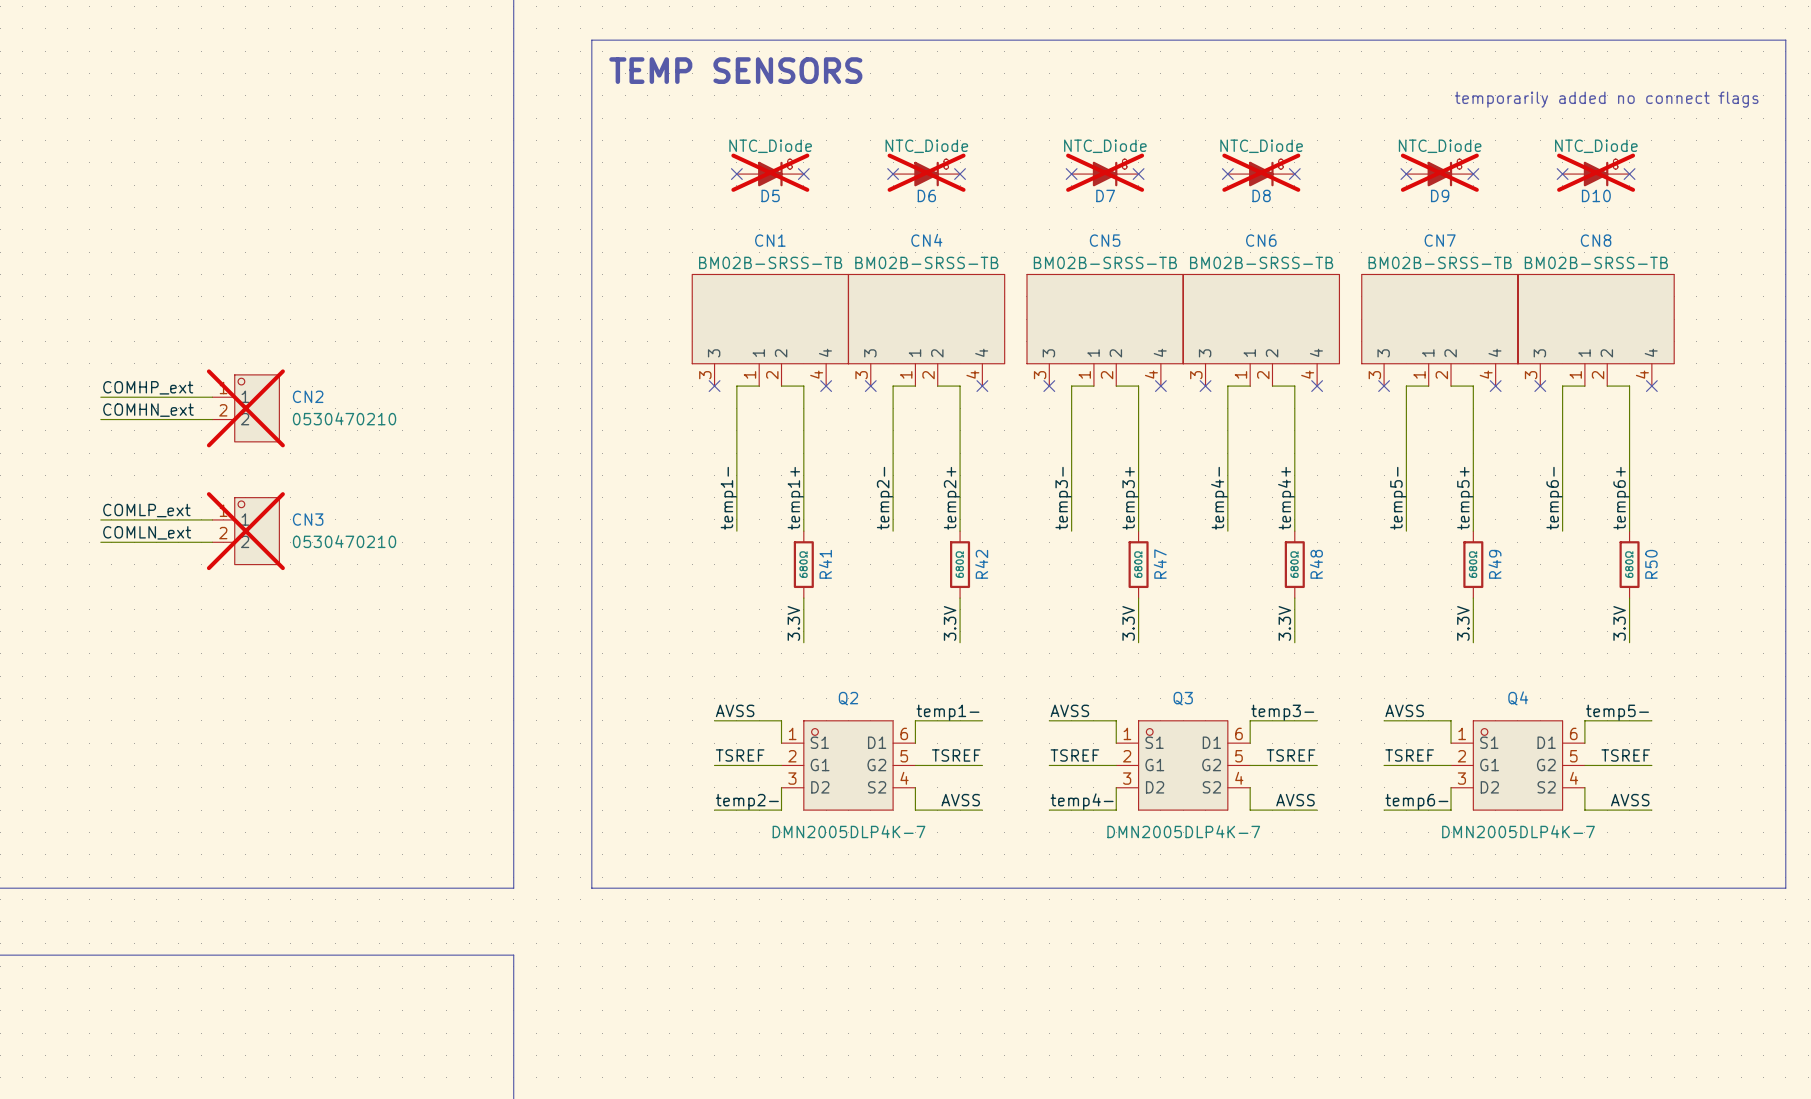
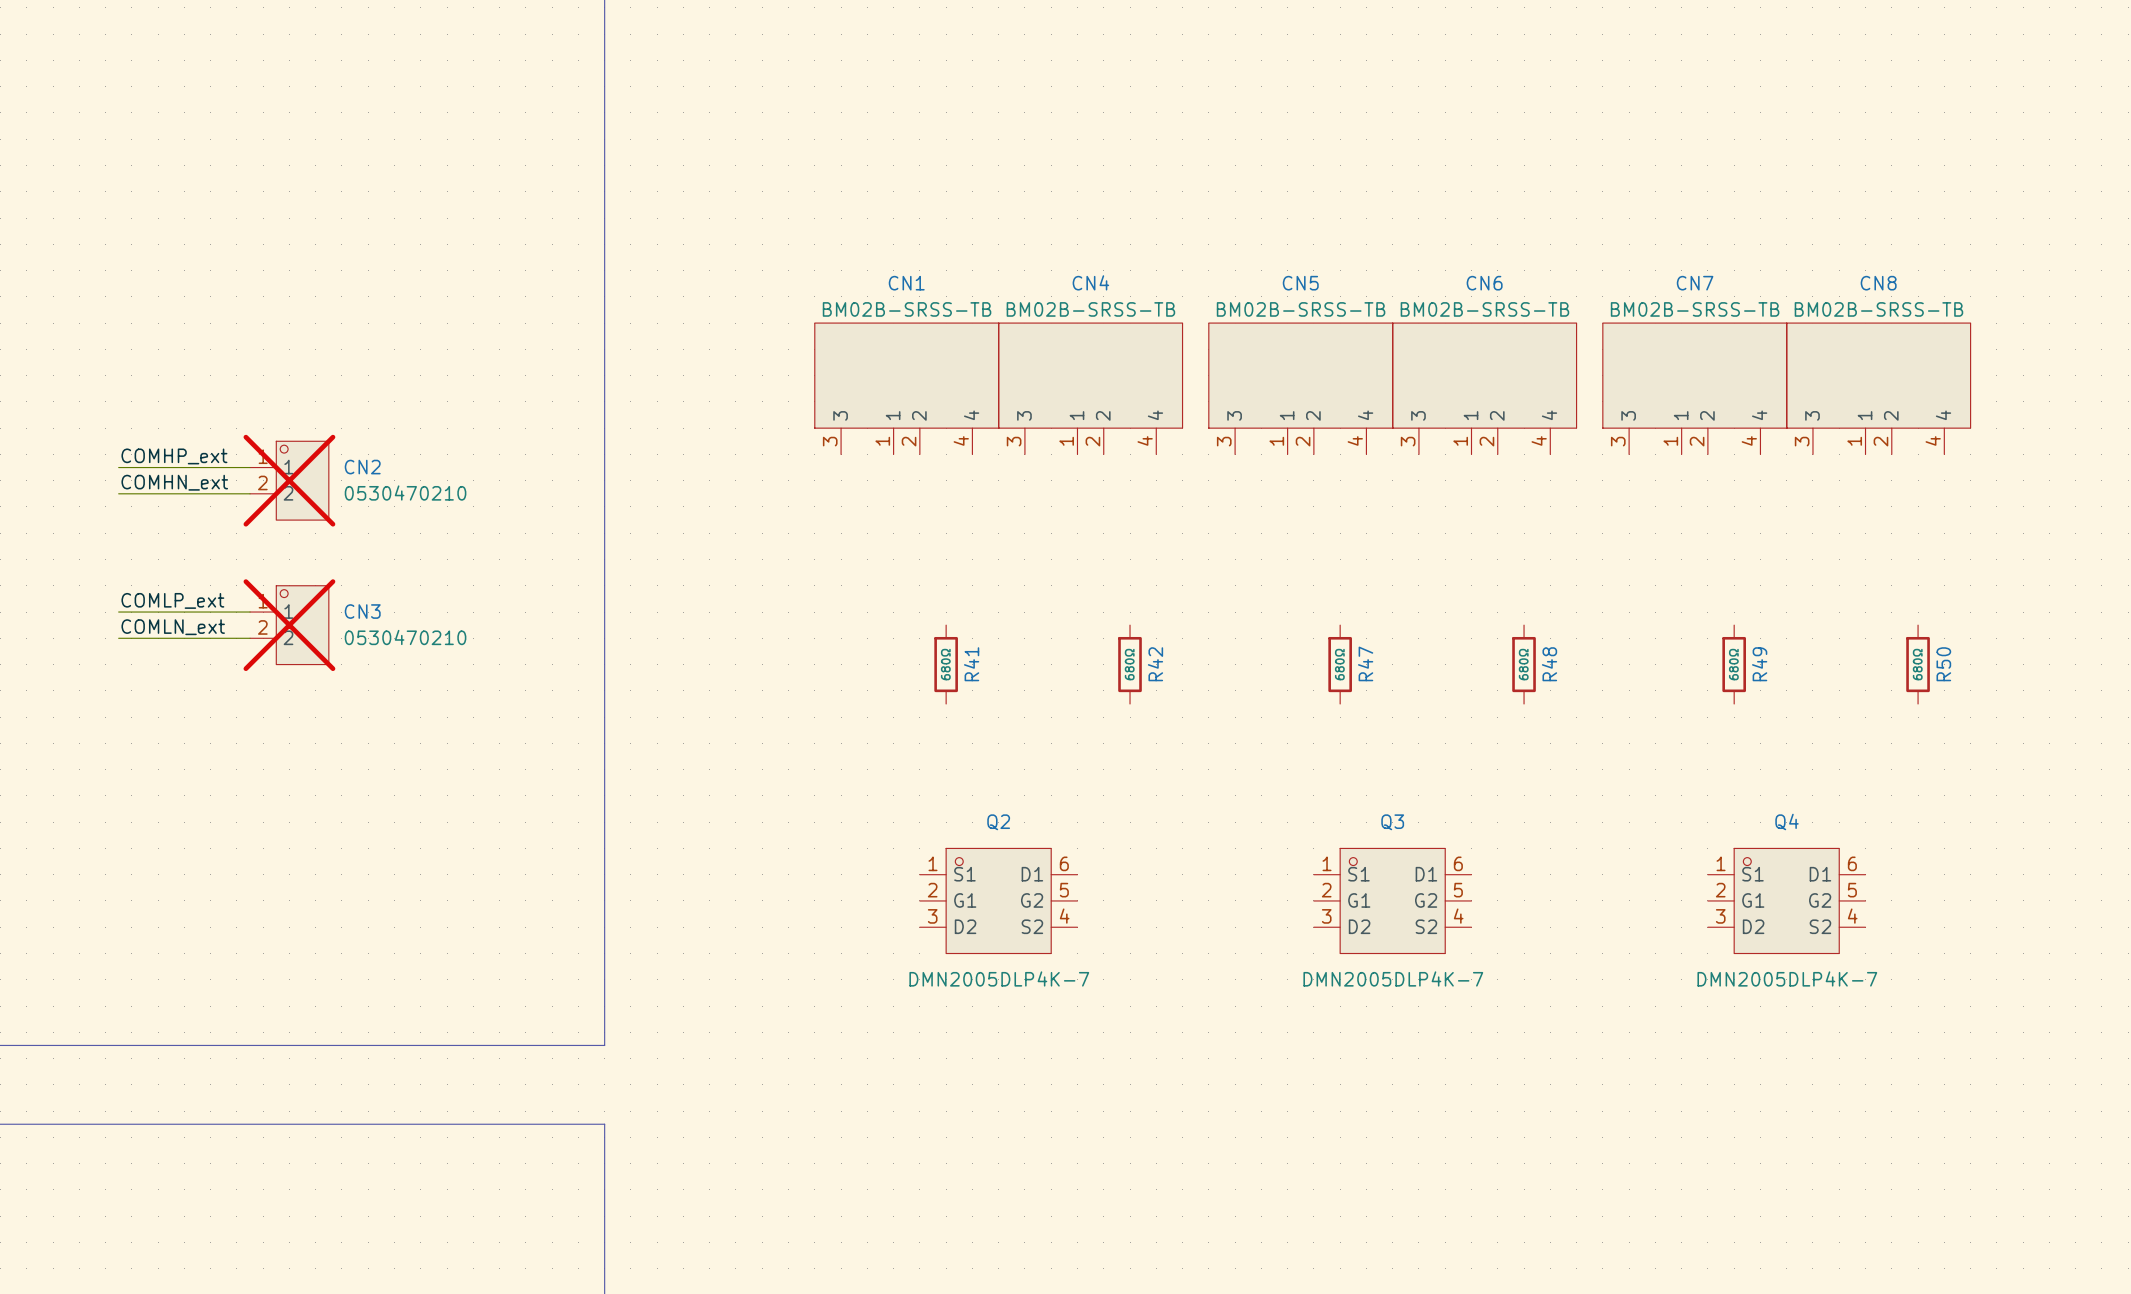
line: (591, 40) (1785, 40) (1785, 888) (591, 888) (591, 40) -> none
text: TEMP SENSORS (735, 70) -> none
text: temporarily added no connect flags (1606, 99) -> none
D5: NTC_Diode (770, 172) -> none
D6: NTC_Diode (926, 172) -> none
D7: NTC_Diode (1105, 172) -> none
D8: NTC_Diode (1261, 172) -> none
D9: NTC_Diode (1439, 172) -> none
D10: NTC_Diode (1596, 172) -> none
no-connect mark: (736, 174) -> none
no-connect mark: (803, 174) -> none
no-connect mark: (893, 174) -> none
no-connect mark: (960, 174) -> none
no-connect mark: (1071, 174) -> none
no-connect mark: (1138, 174) -> none
no-connect mark: (1227, 174) -> none
no-connect mark: (1294, 174) -> none
no-connect mark: (1406, 174) -> none
no-connect mark: (1473, 174) -> none
no-connect mark: (1562, 174) -> none
no-connect mark: (1629, 174) -> none
no-connect mark: (714, 386) -> none
wire: (759, 386) (736, 386) (736, 531) -> none
wire: (781, 386) (803, 386) (803, 531) -> none
no-connect mark: (826, 386) -> none
no-connect mark: (870, 386) -> none
wire: (915, 386) (893, 386) (893, 531) -> none
wire: (937, 386) (960, 386) (960, 531) -> none
no-connect mark: (982, 386) -> none
no-connect mark: (1049, 386) -> none
wire: (1093, 386) (1071, 386) (1071, 531) -> none
wire: (1116, 386) (1138, 386) (1138, 531) -> none
no-connect mark: (1160, 386) -> none
no-connect mark: (1205, 386) -> none
wire: (1250, 386) (1227, 386) (1227, 531) -> none
wire: (1272, 386) (1294, 386) (1294, 531) -> none
no-connect mark: (1317, 386) -> none
no-connect mark: (1384, 386) -> none
wire: (1428, 386) (1406, 386) (1406, 531) -> none
wire: (1451, 386) (1473, 386) (1473, 531) -> none
no-connect mark: (1495, 386) -> none
no-connect mark: (1540, 386) -> none
wire: (1584, 386) (1562, 386) (1562, 531) -> none
wire: (1607, 386) (1629, 386) (1629, 531) -> none
no-connect mark: (1651, 386) -> none
label: temp1- (728, 498) -> none
label: temp1+ (795, 498) -> none
label: temp2- (884, 498) -> none
label: temp2+ (951, 498) -> none
label: temp3- (1063, 498) -> none
label: temp3+ (1130, 498) -> none
label: temp4- (1219, 498) -> none
label: temp4+ (1286, 498) -> none
label: temp5- (1398, 498) -> none
label: temp5+ (1465, 498) -> none
label: temp6- (1554, 498) -> none
label: temp6+ (1621, 498) -> none
wire: (803, 598) (803, 642) -> none
wire: (960, 598) (960, 642) -> none
wire: (1138, 598) (1138, 642) -> none
wire: (1294, 598) (1294, 642) -> none
wire: (1473, 598) (1473, 642) -> none
wire: (1629, 598) (1629, 642) -> none
label: 3.3V (793, 623) -> none
label: 3.3V (950, 623) -> none
label: 3.3V (1128, 623) -> none
label: 3.3V (1284, 623) -> none
label: 3.3V (1463, 623) -> none
label: 3.3V (1619, 623) -> none
label: AVSS (735, 710) -> none
label: AVSS (1069, 710) -> none
label: AVSS (1404, 710) -> none
label: temp1- (947, 712) -> none
label: temp3- (1282, 712) -> none
label: temp5- (1617, 712) -> none
wire: (714, 720) (781, 720) (781, 743) -> none
wire: (982, 720) (915, 720) (915, 743) -> none
wire: (1049, 720) (1116, 720) (1116, 743) -> none
wire: (1317, 720) (1250, 720) (1250, 743) -> none
wire: (1384, 720) (1451, 720) (1451, 743) -> none
wire: (1651, 720) (1584, 720) (1584, 743) -> none
label: TSREF (740, 755) -> none
label: TSREF (956, 755) -> none
label: TSREF (1074, 755) -> none
label: TSREF (1290, 755) -> none
label: TSREF (1409, 755) -> none
label: TSREF (1625, 755) -> none
wire: (714, 765) (781, 765) -> none
wire: (915, 765) (982, 765) -> none
wire: (1049, 765) (1116, 765) -> none
wire: (1250, 765) (1317, 765) -> none
wire: (1384, 765) (1451, 765) -> none
wire: (1584, 765) (1651, 765) -> none
wire: (781, 787) (781, 810) (714, 810) -> none
wire: (915, 787) (915, 810) (982, 810) -> none
wire: (1116, 787) (1116, 810) (1049, 810) -> none
wire: (1250, 787) (1250, 810) (1317, 810) -> none
wire: (1451, 787) (1451, 810) (1384, 810) -> none
wire: (1584, 787) (1584, 810) (1651, 810) -> none
label: AVSS (960, 800) -> none
label: AVSS (1295, 800) -> none
label: AVSS (1630, 800) -> none
label: temp2- (747, 801) -> none
label: temp4- (1082, 801) -> none
label: temp6- (1416, 801) -> none

